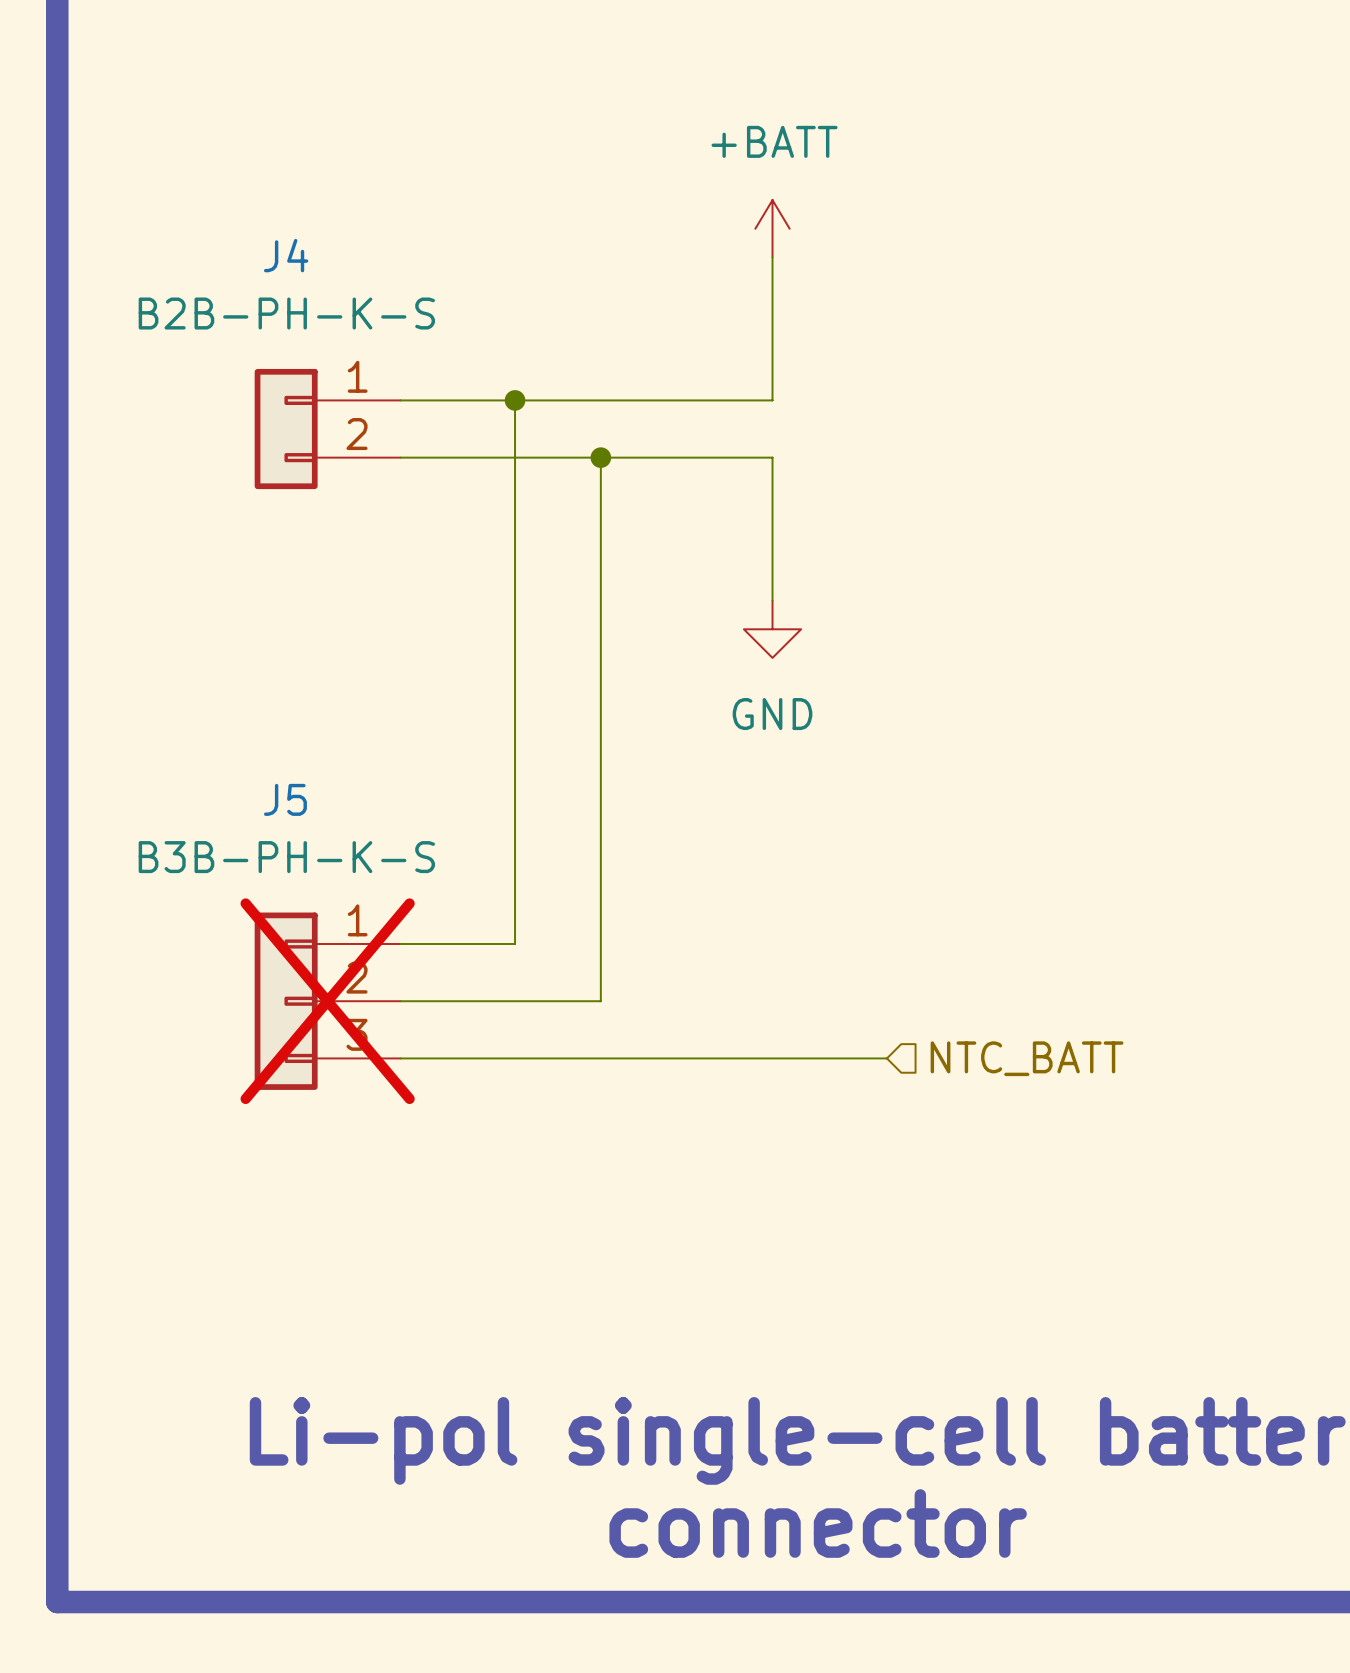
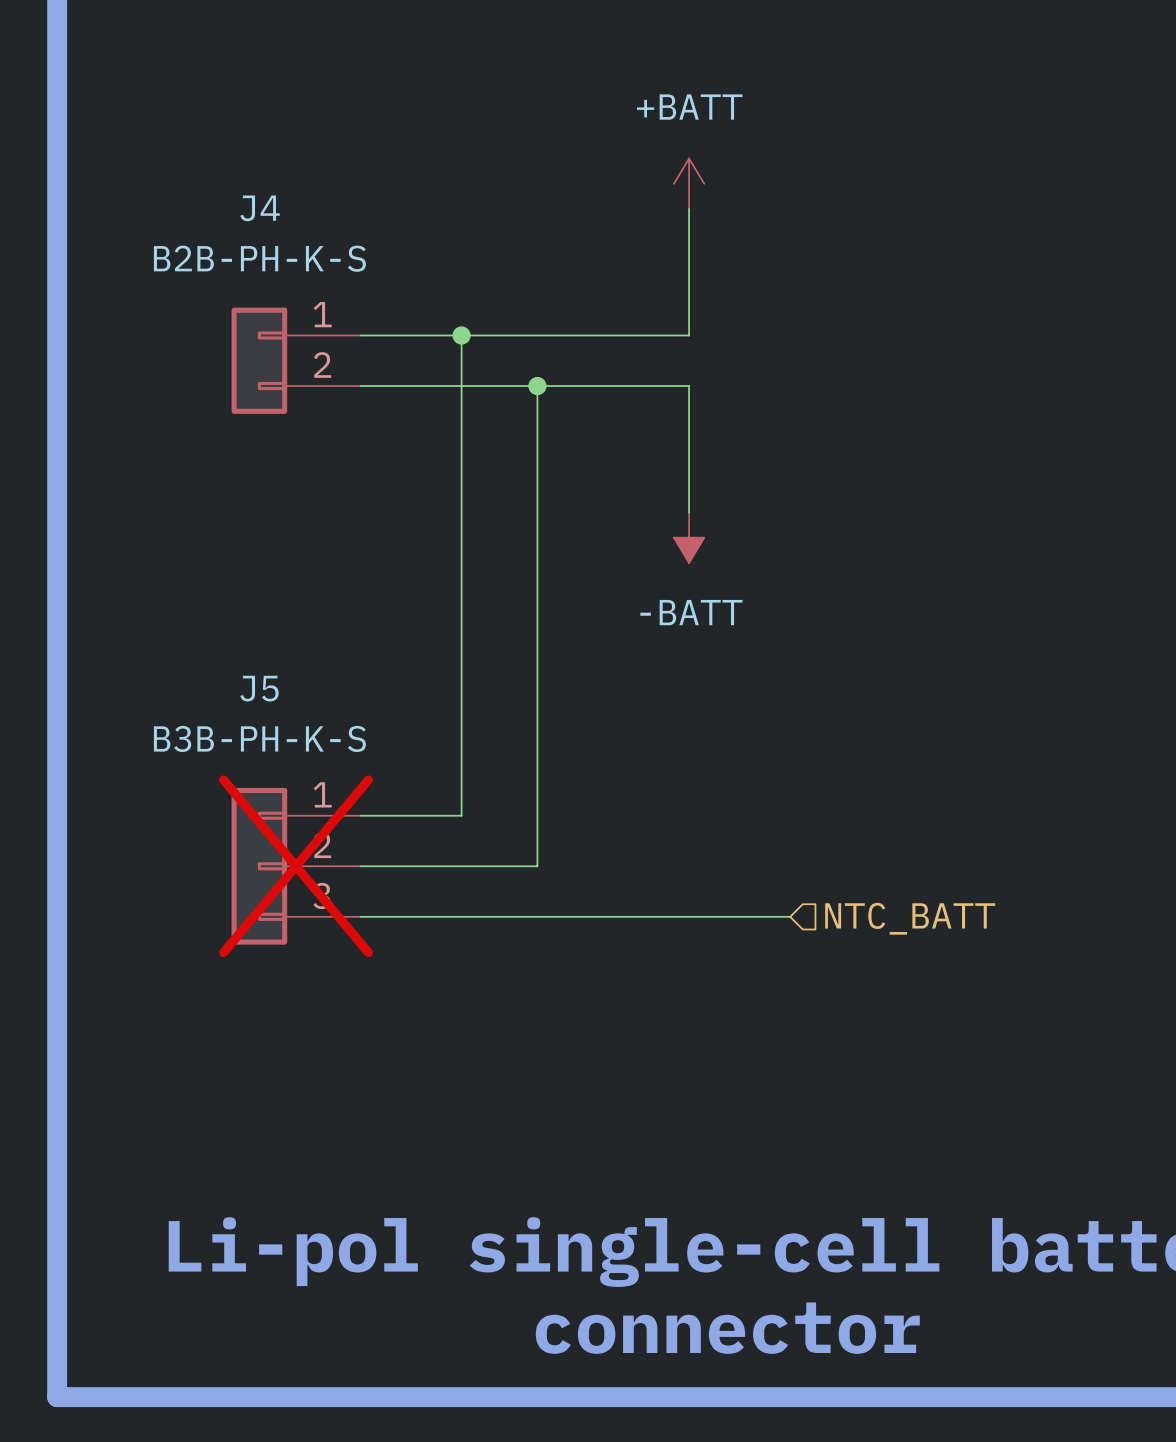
power symbol: GND (772, 629) -> -BATT (689, 537)

